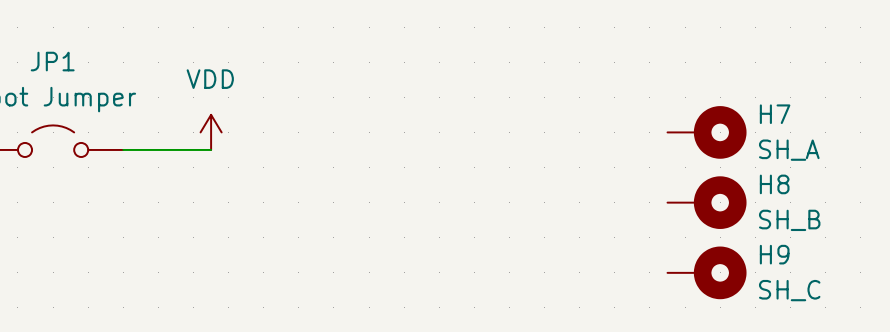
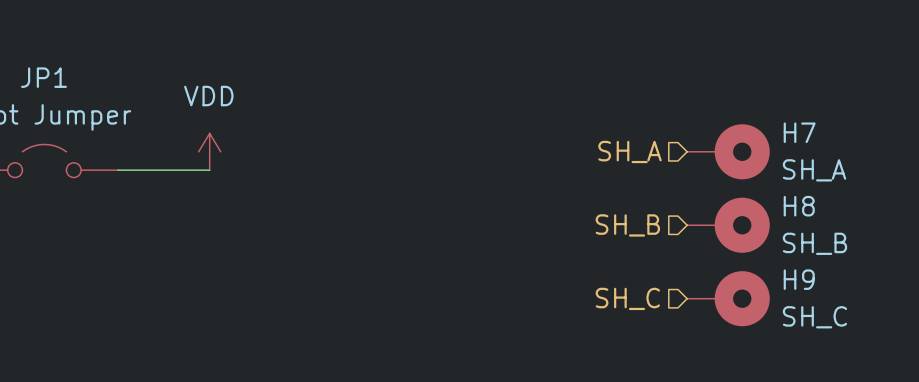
hierarchical label: none -> SH_A (630, 151)
hierarchical label: none -> SH_B (627, 225)
hierarchical label: none -> SH_C (627, 298)

